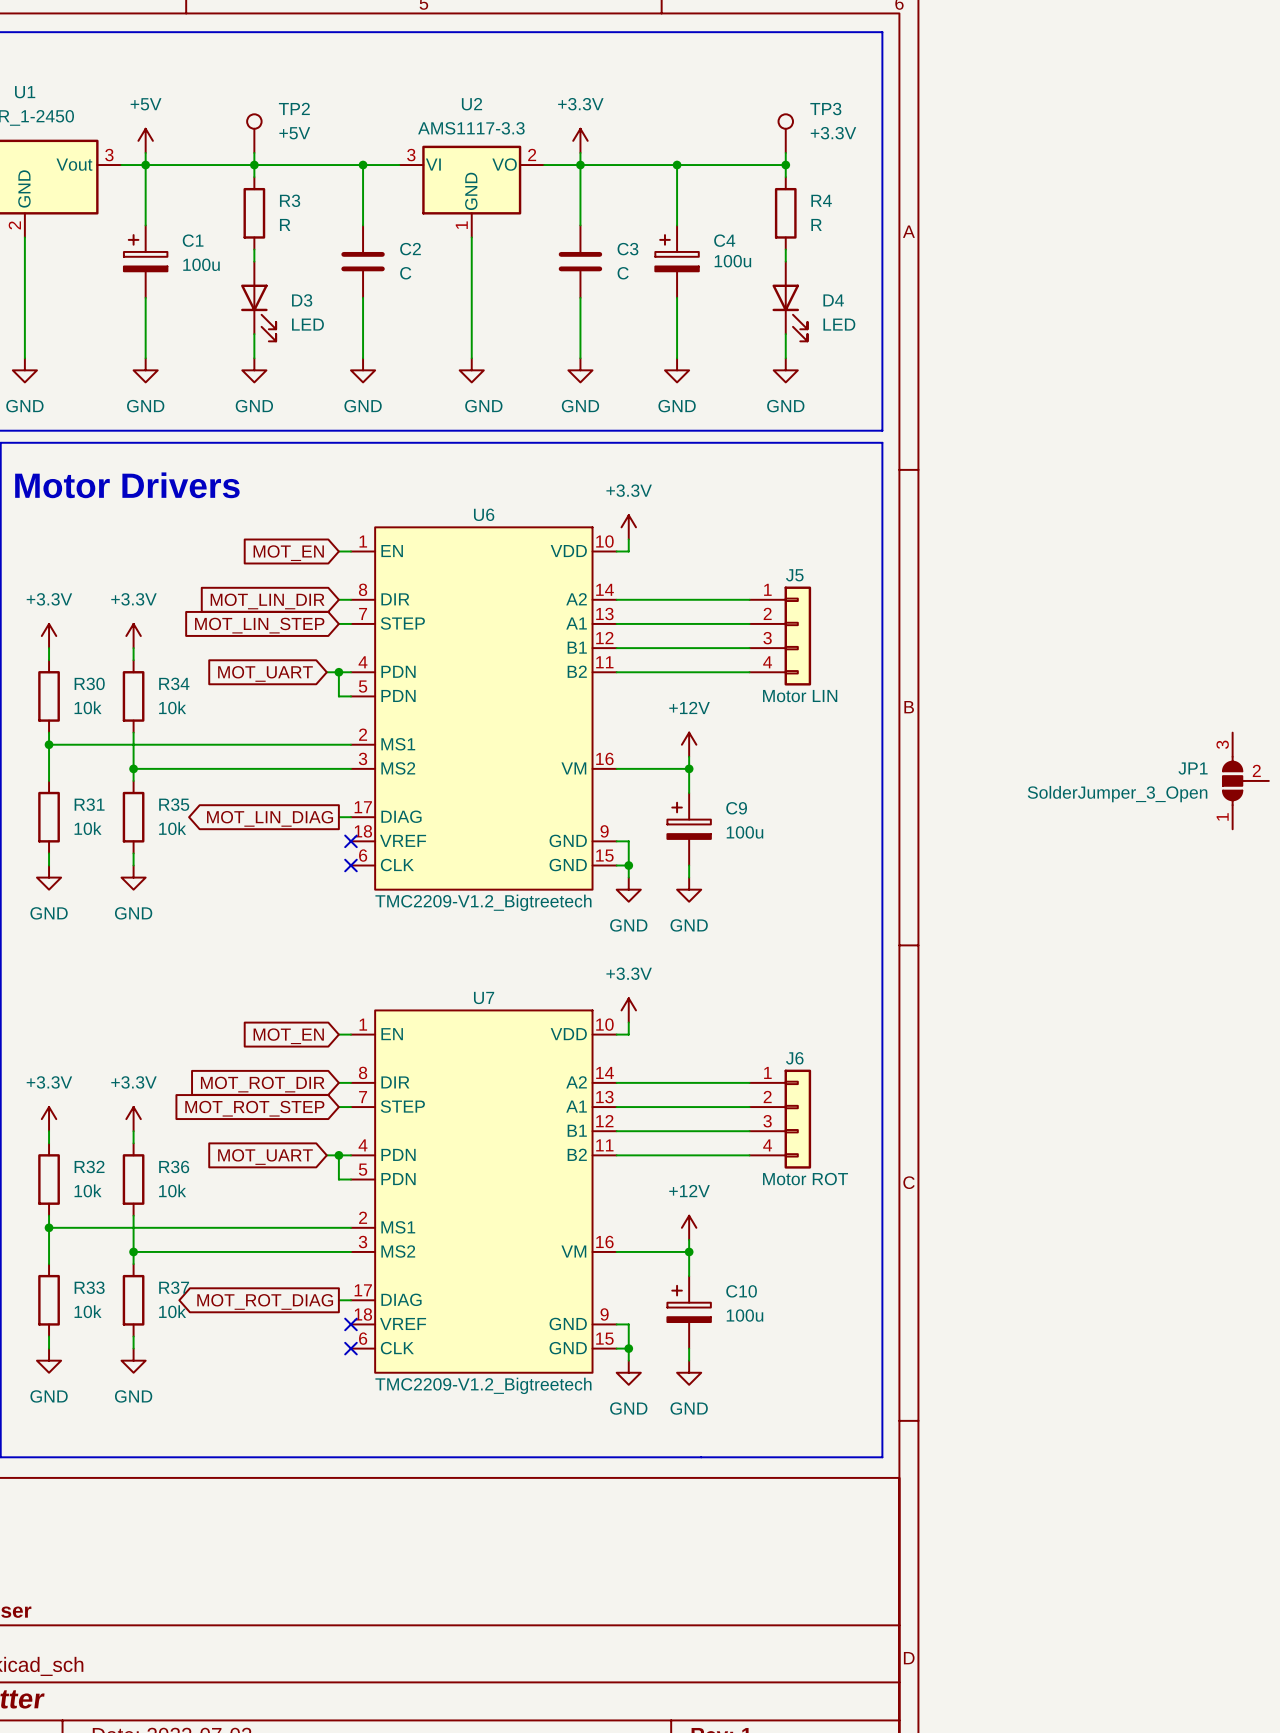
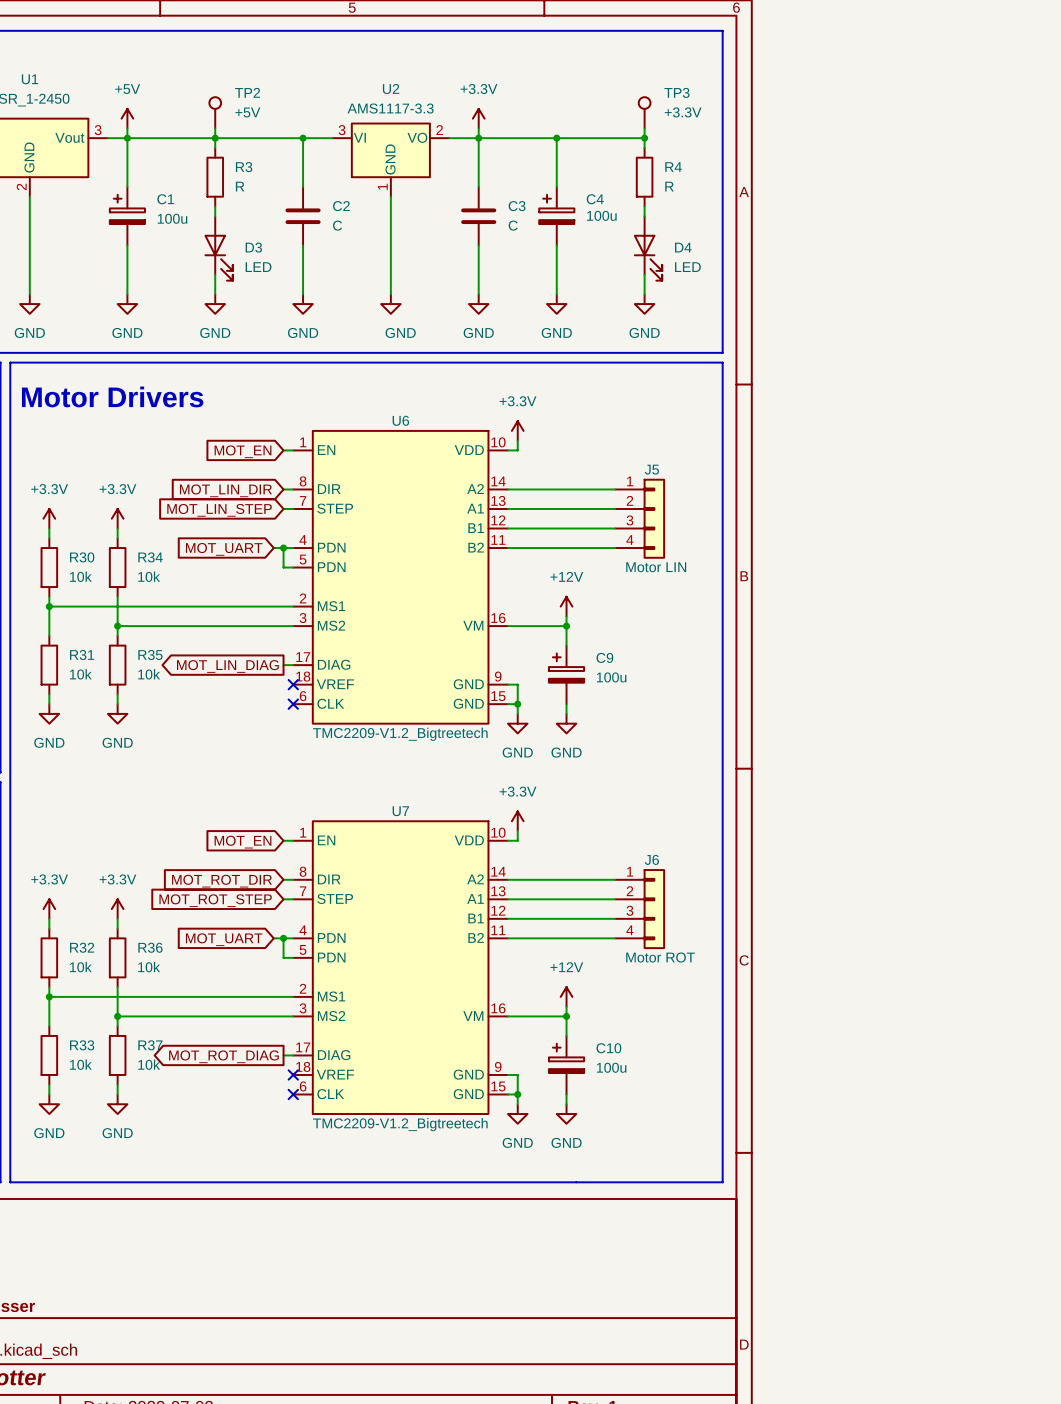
JP1: SolderJumper_3_Open (1245, 780) -> none

